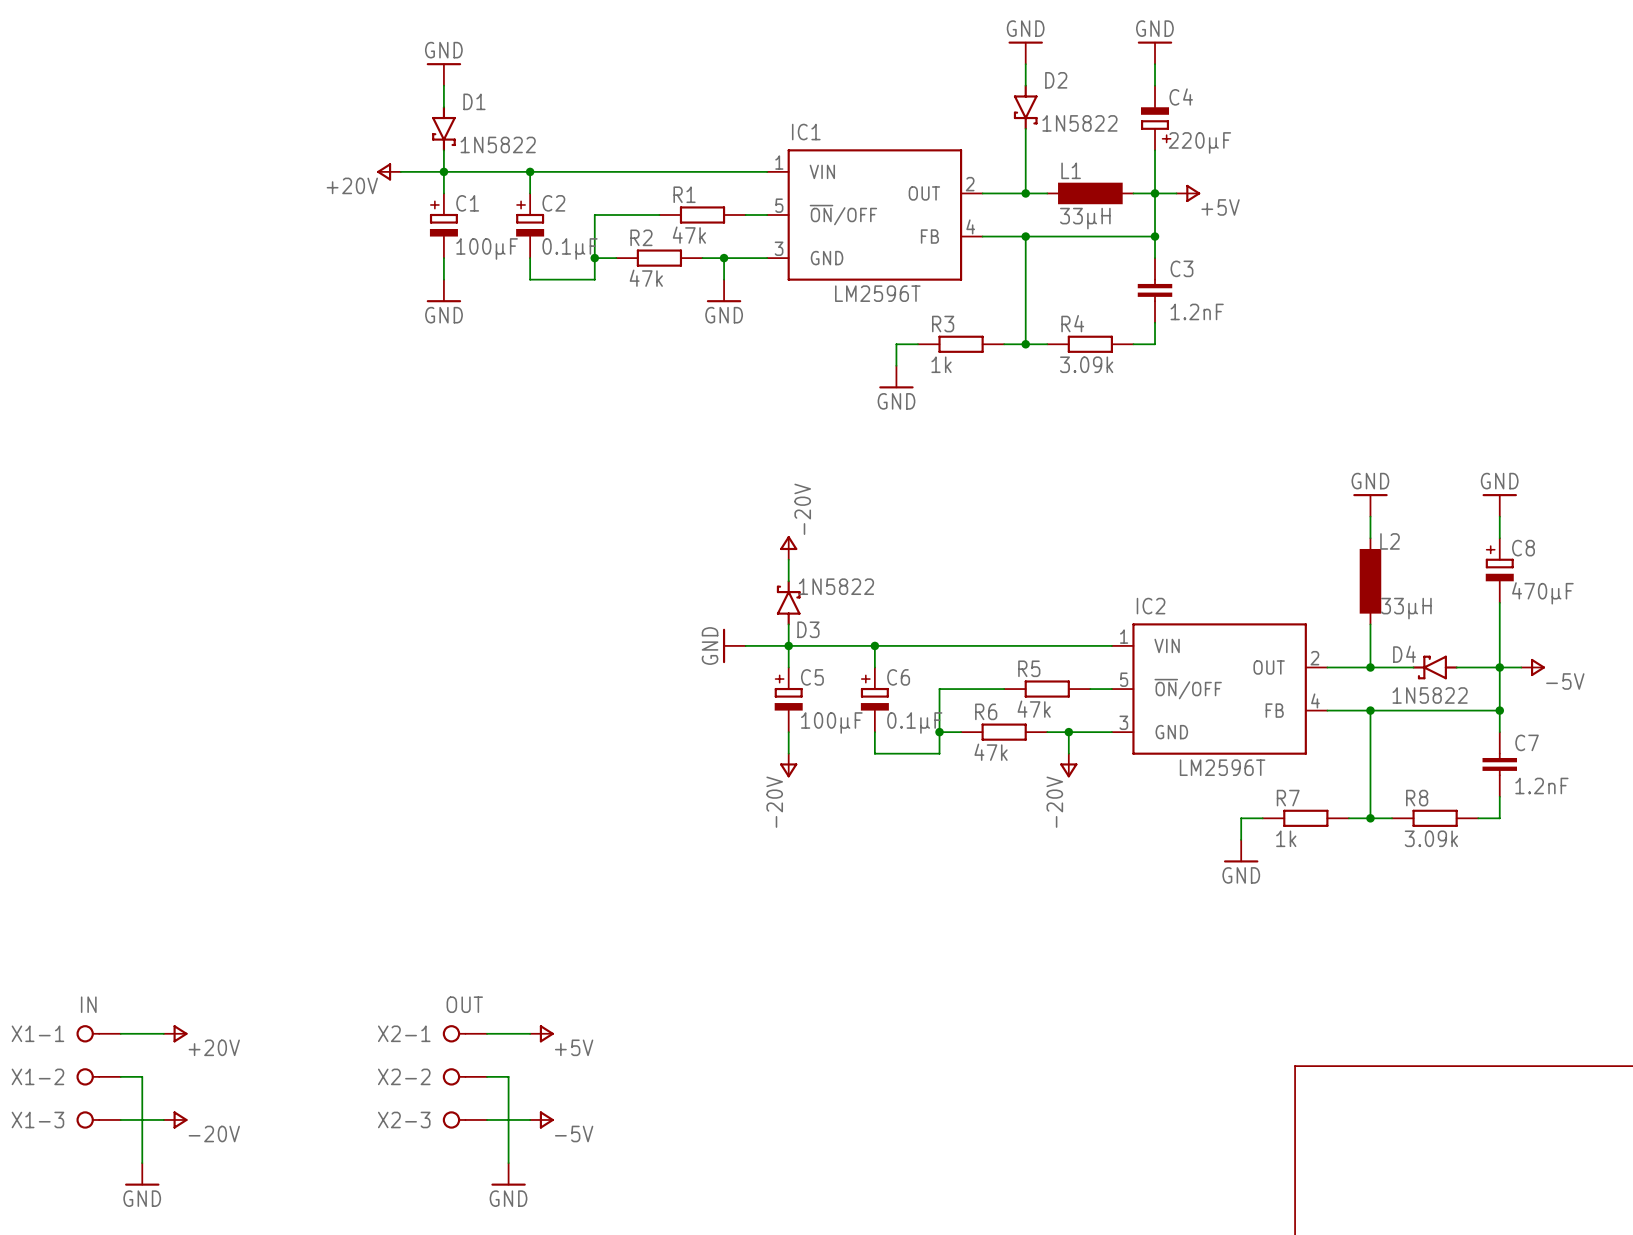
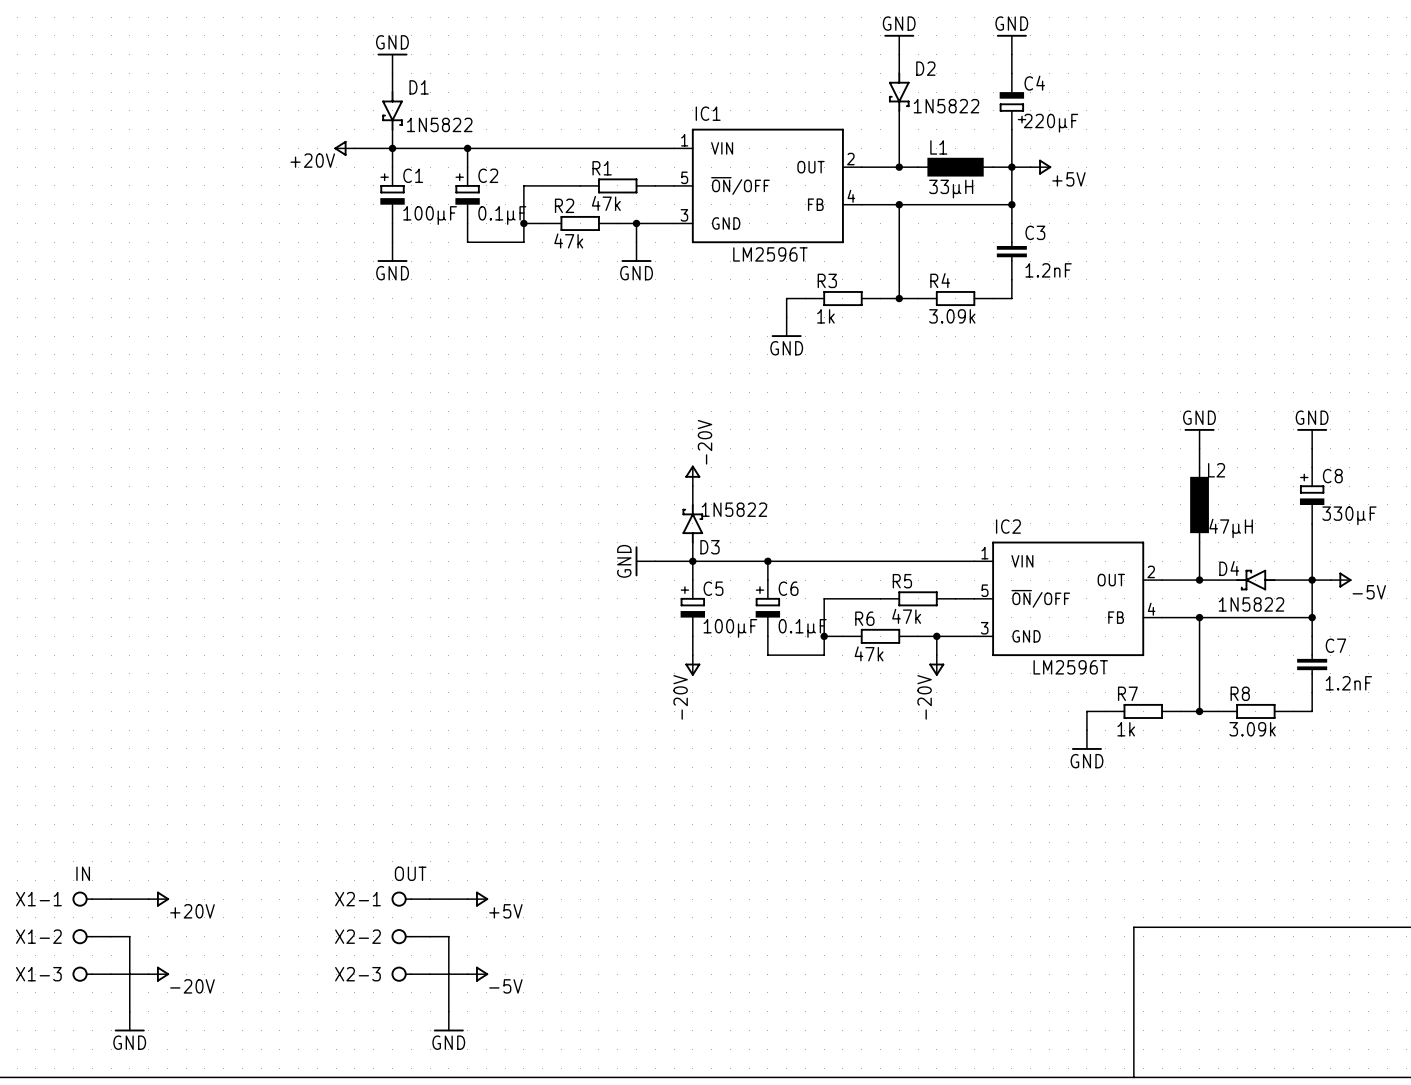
C8 value: 470µF (1542, 593) -> 330µF (1349, 515)
L2 value: 33µH (1406, 608) -> 47µH (1231, 528)

